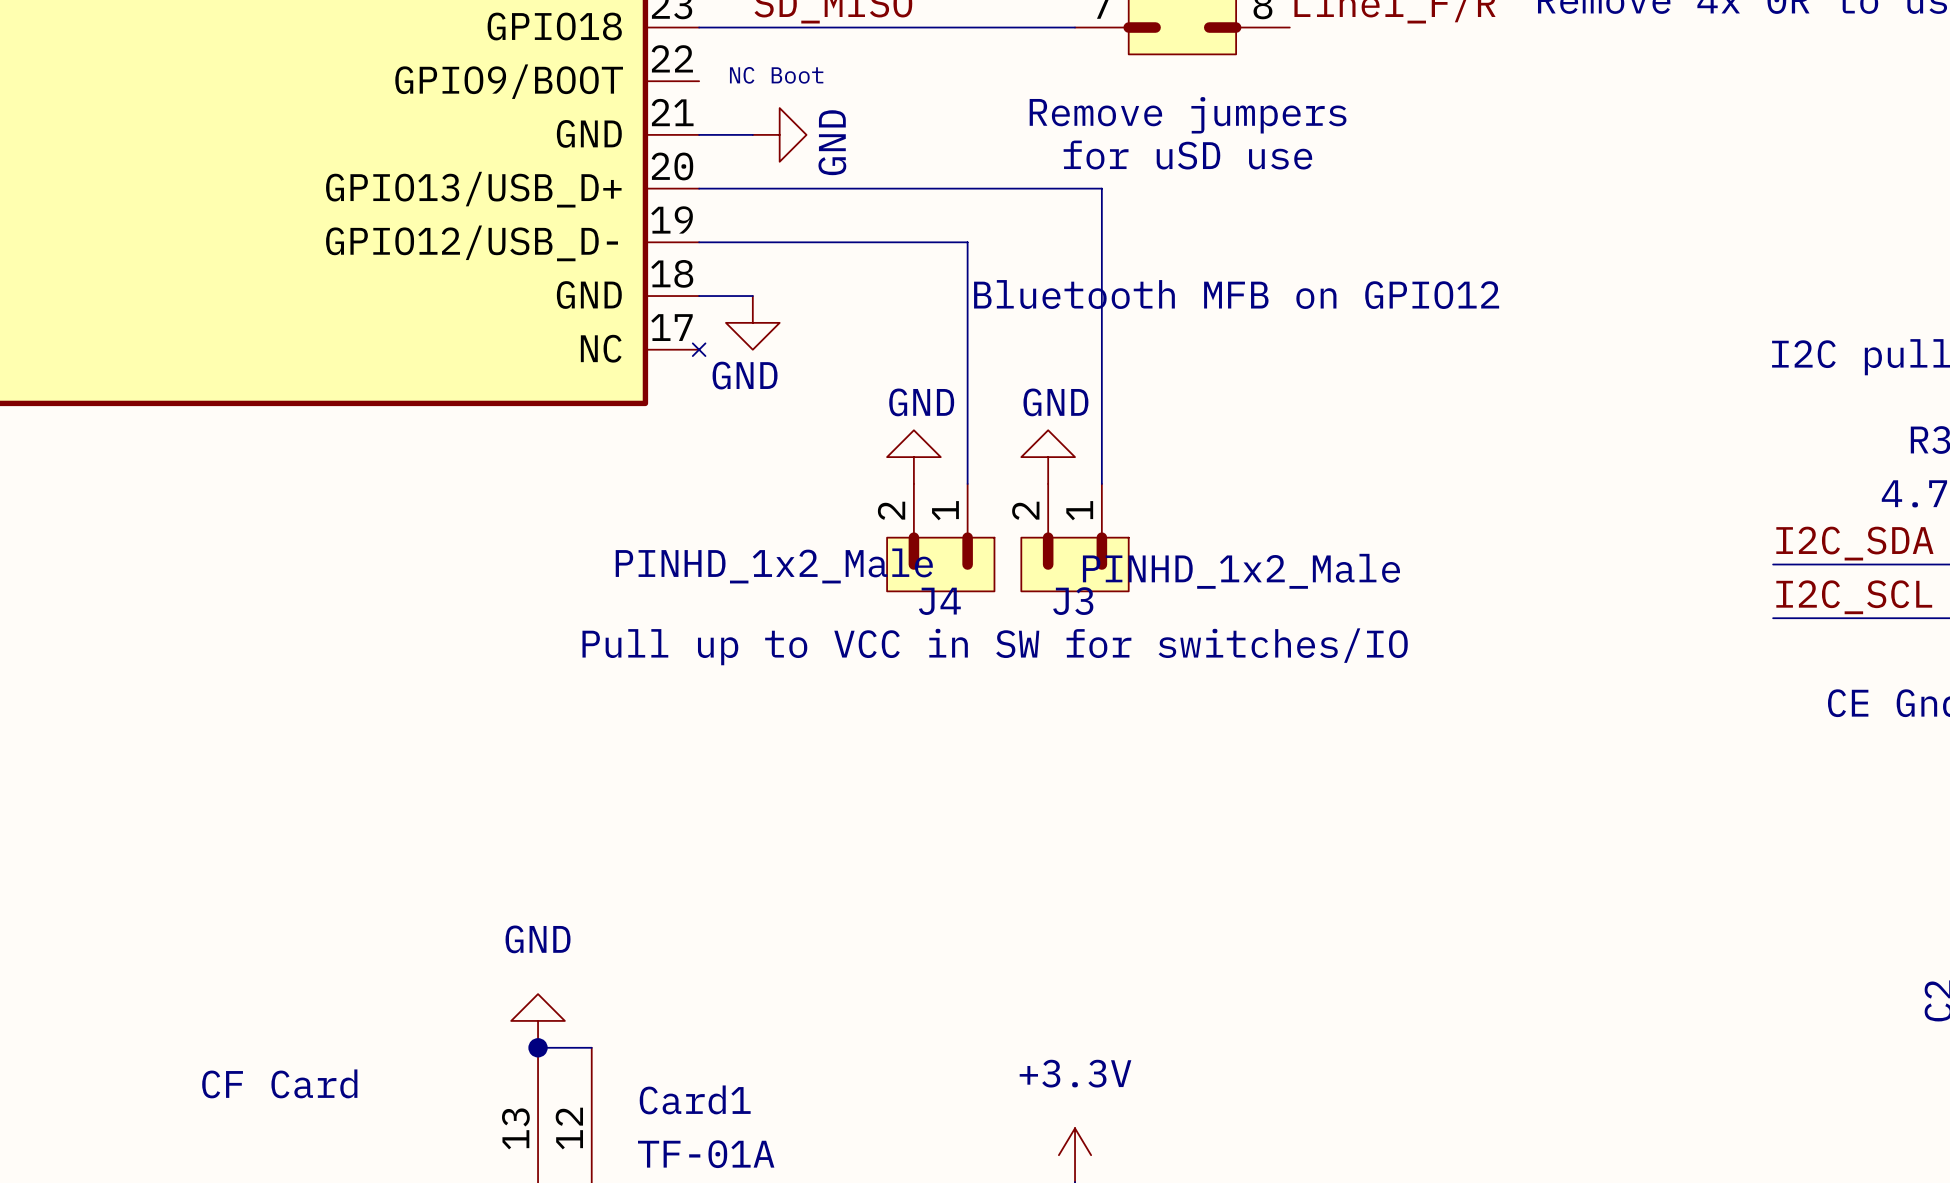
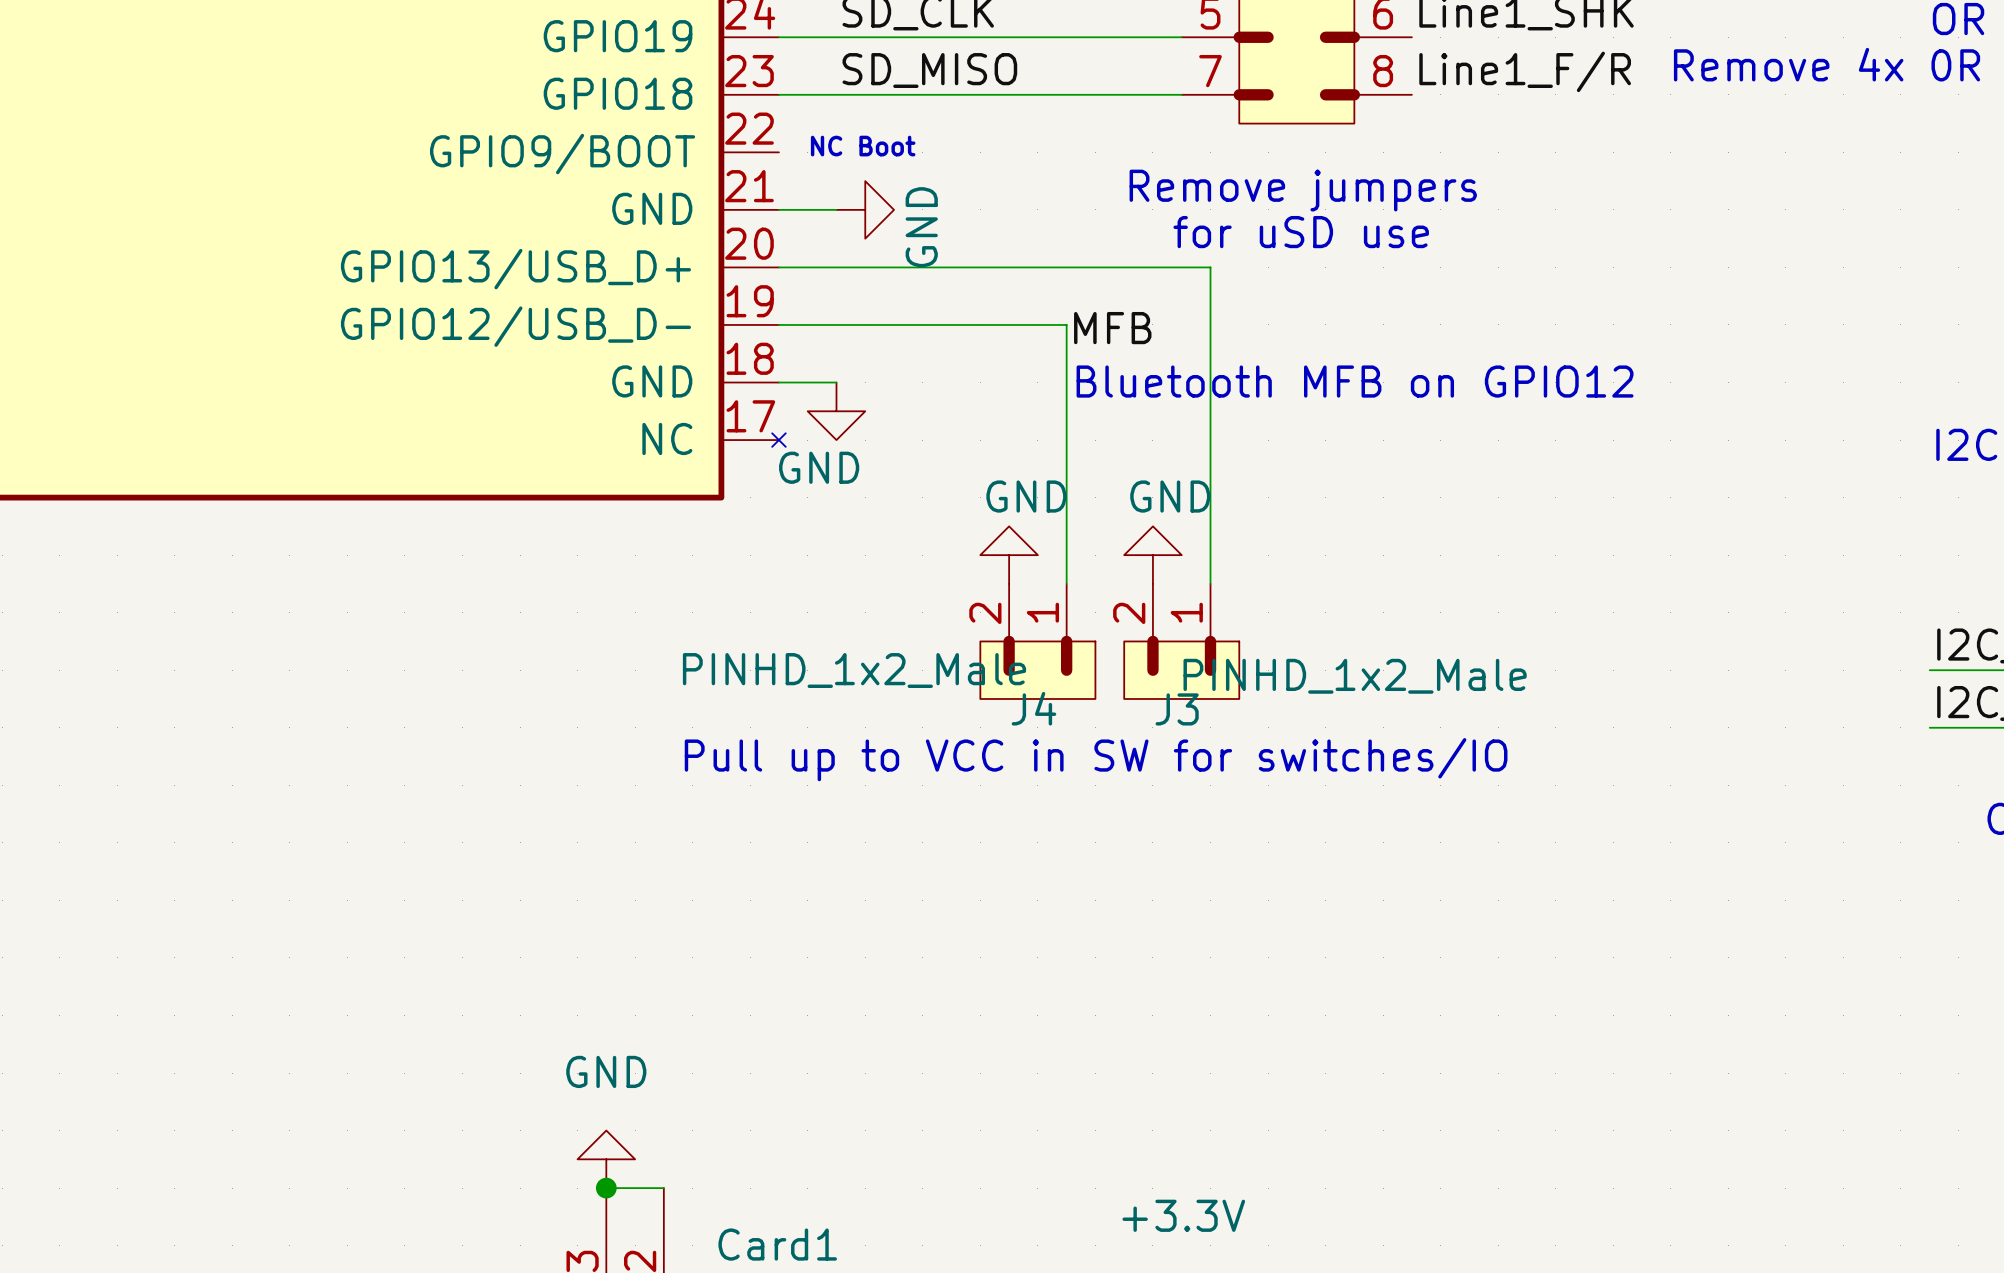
label: none -> MFB (1112, 328)
text: CF Card (279, 1083) -> none

